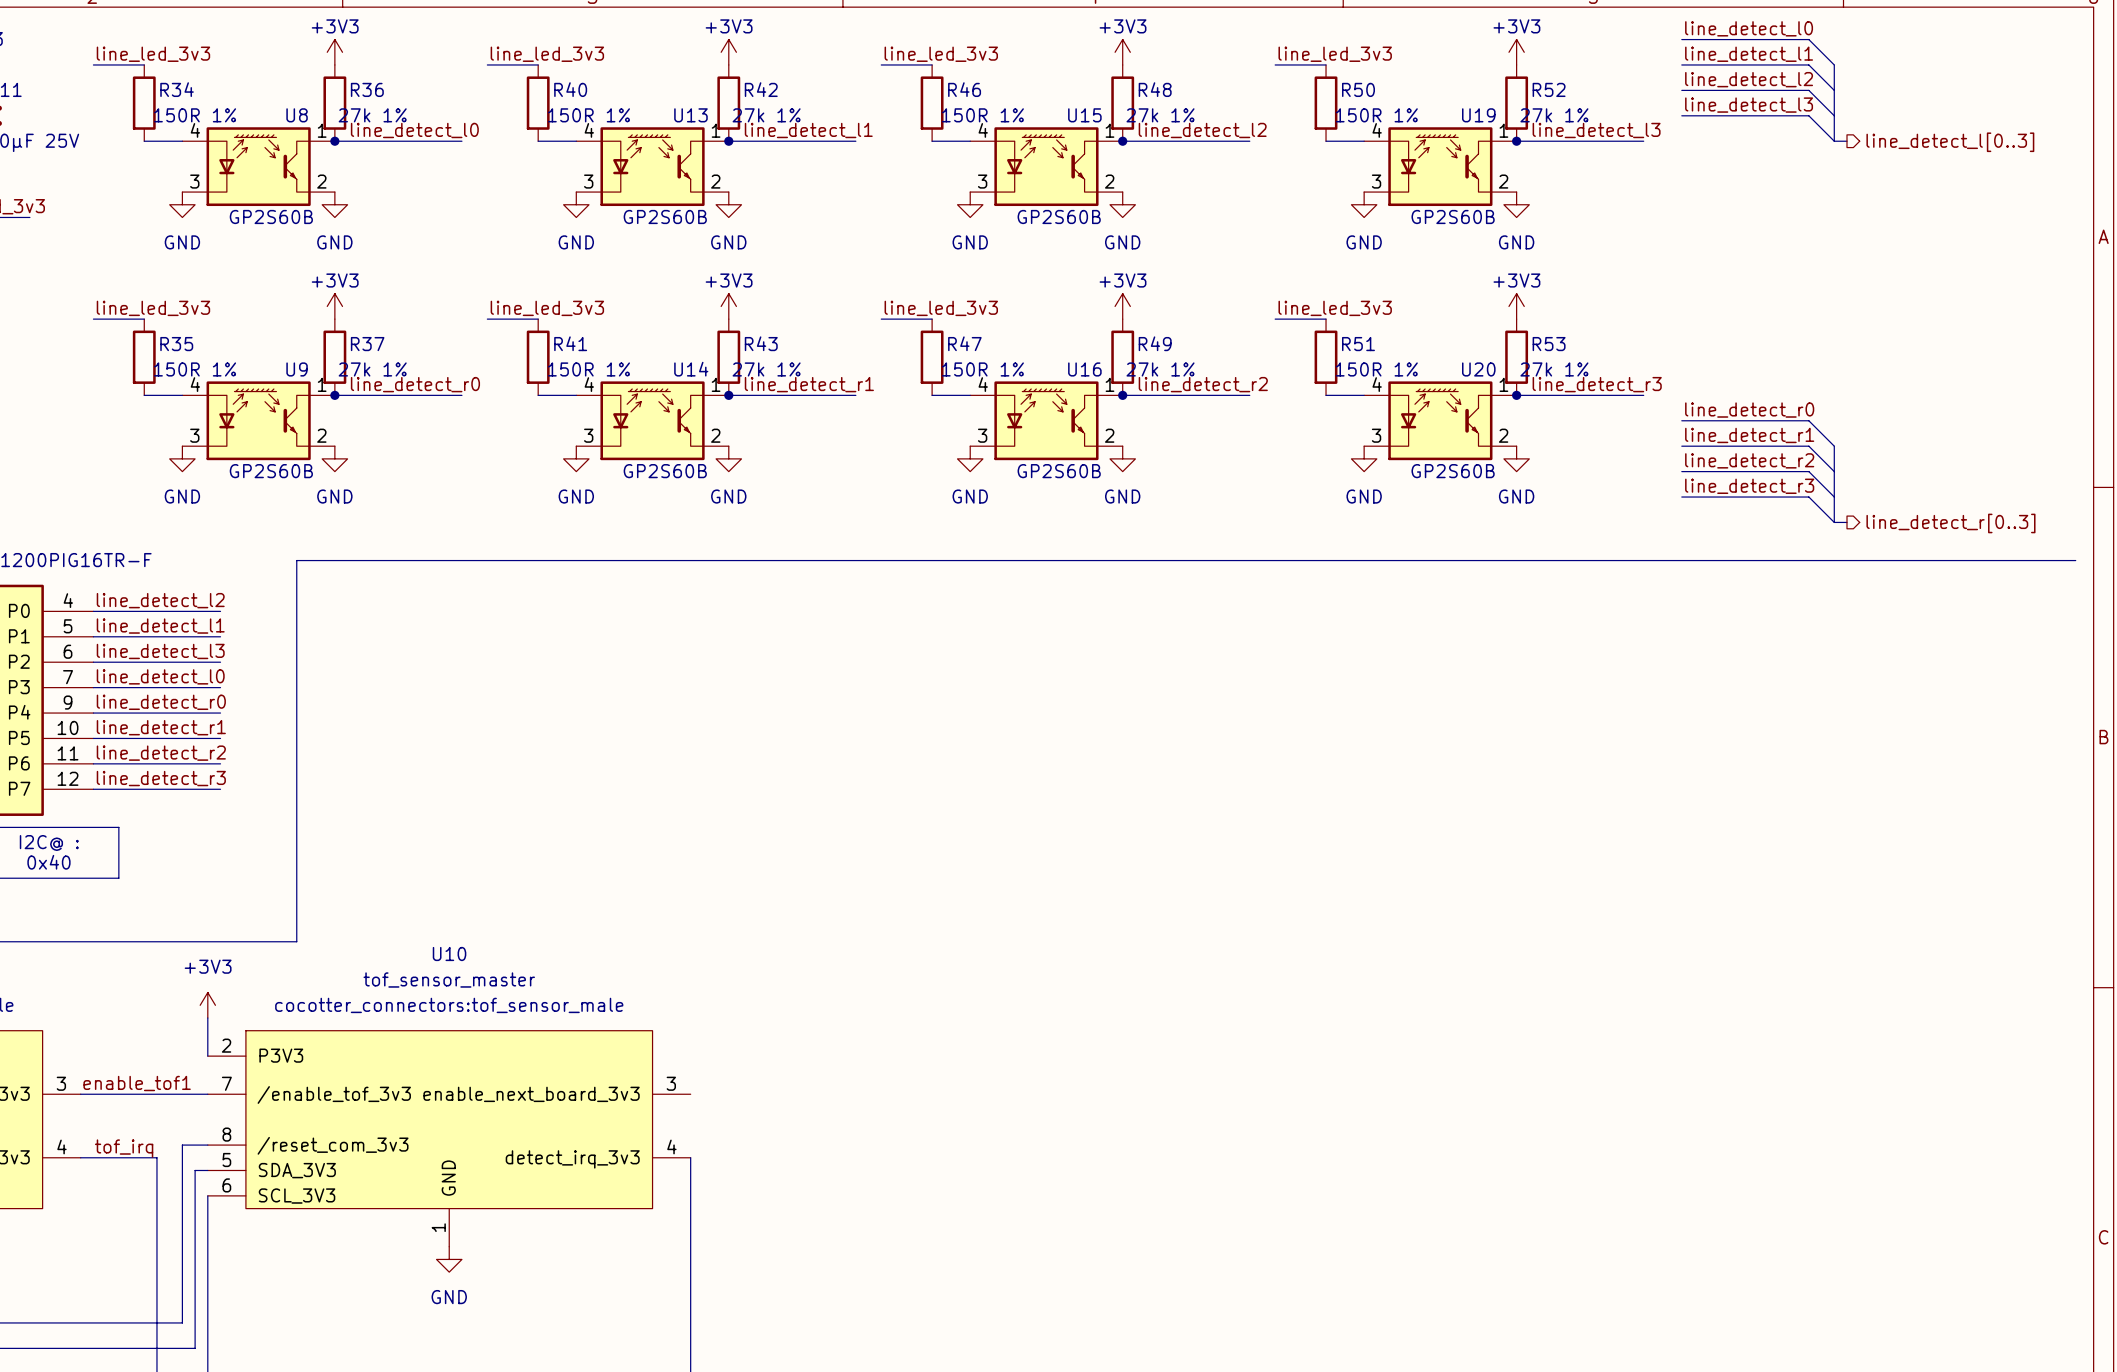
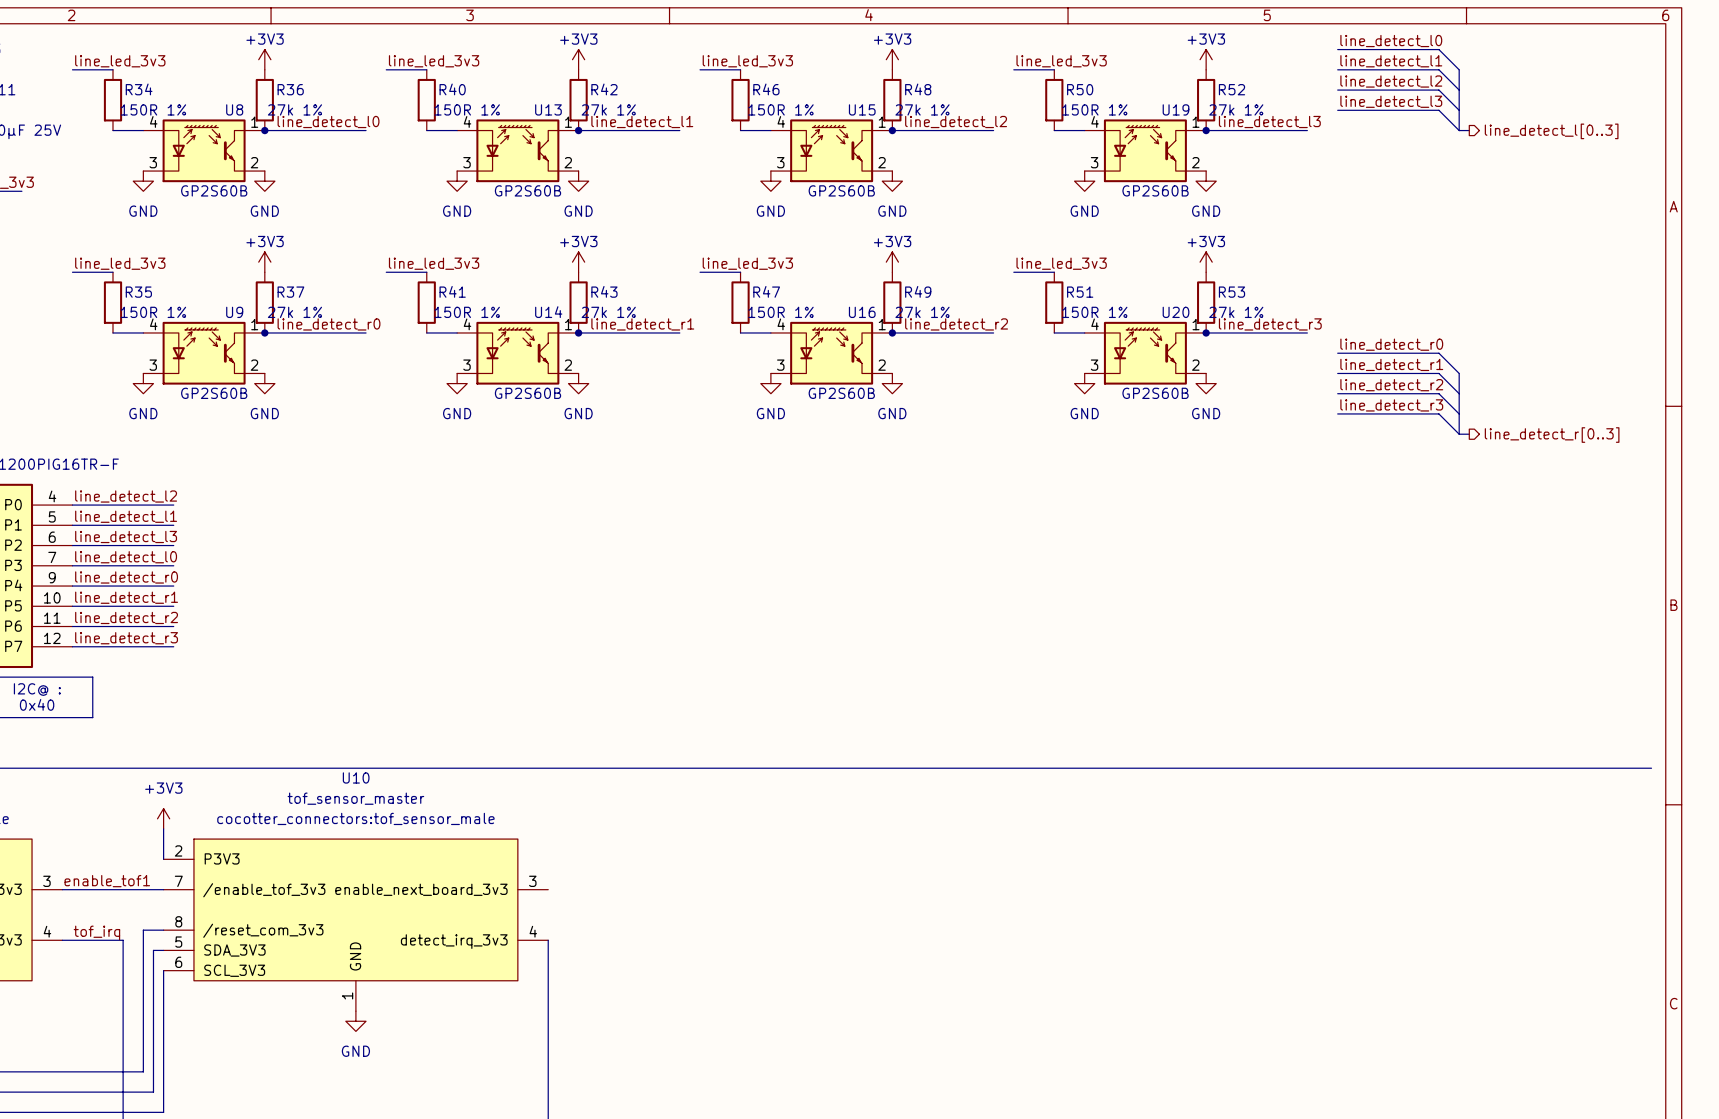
wire: (2075, 560) (296, 560) (296, 941) -> (1651, 768) (234, 768)

